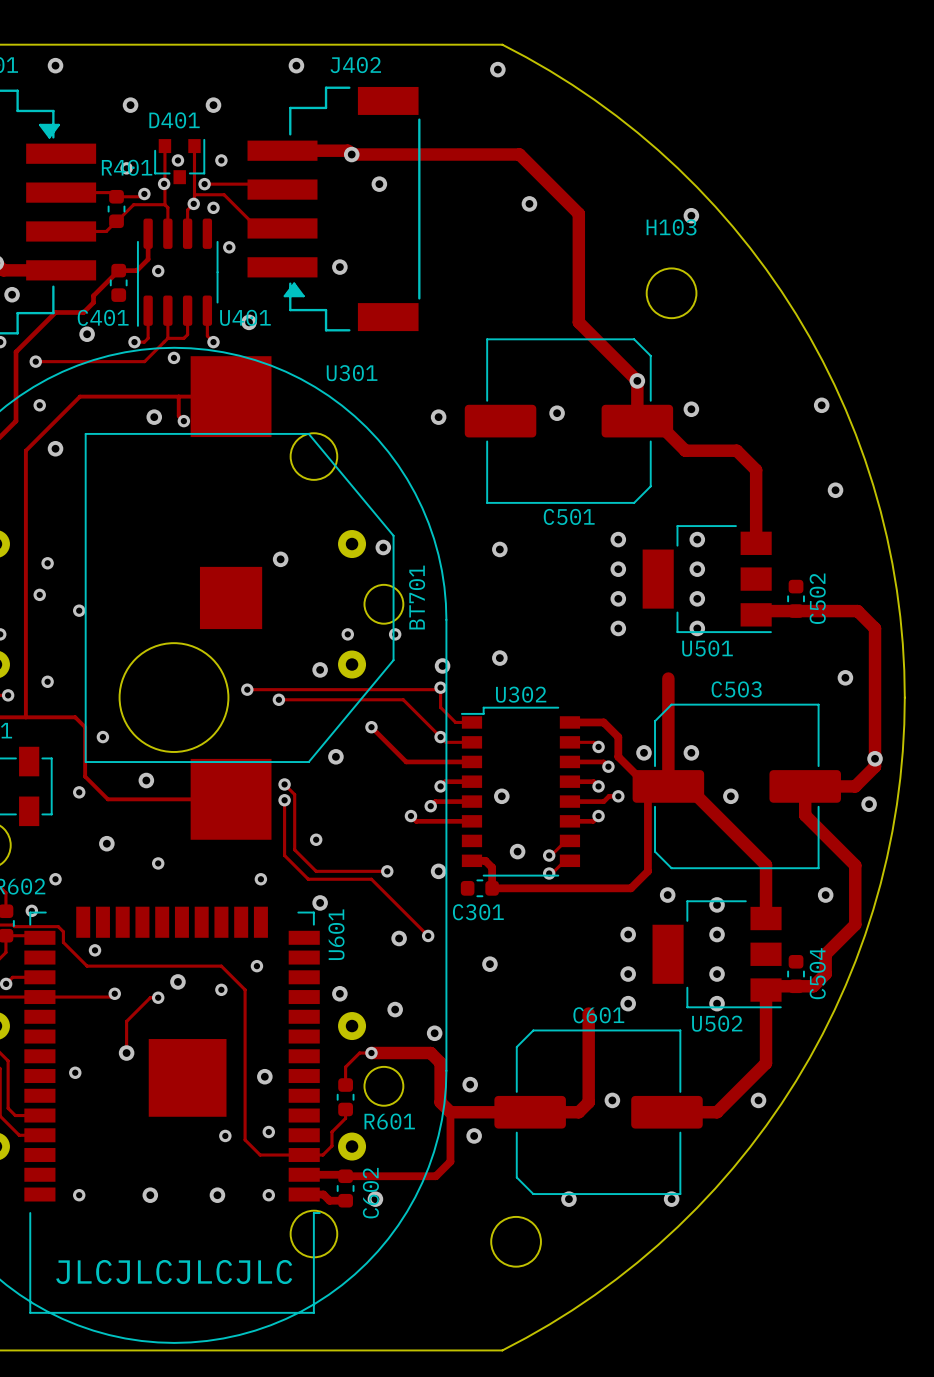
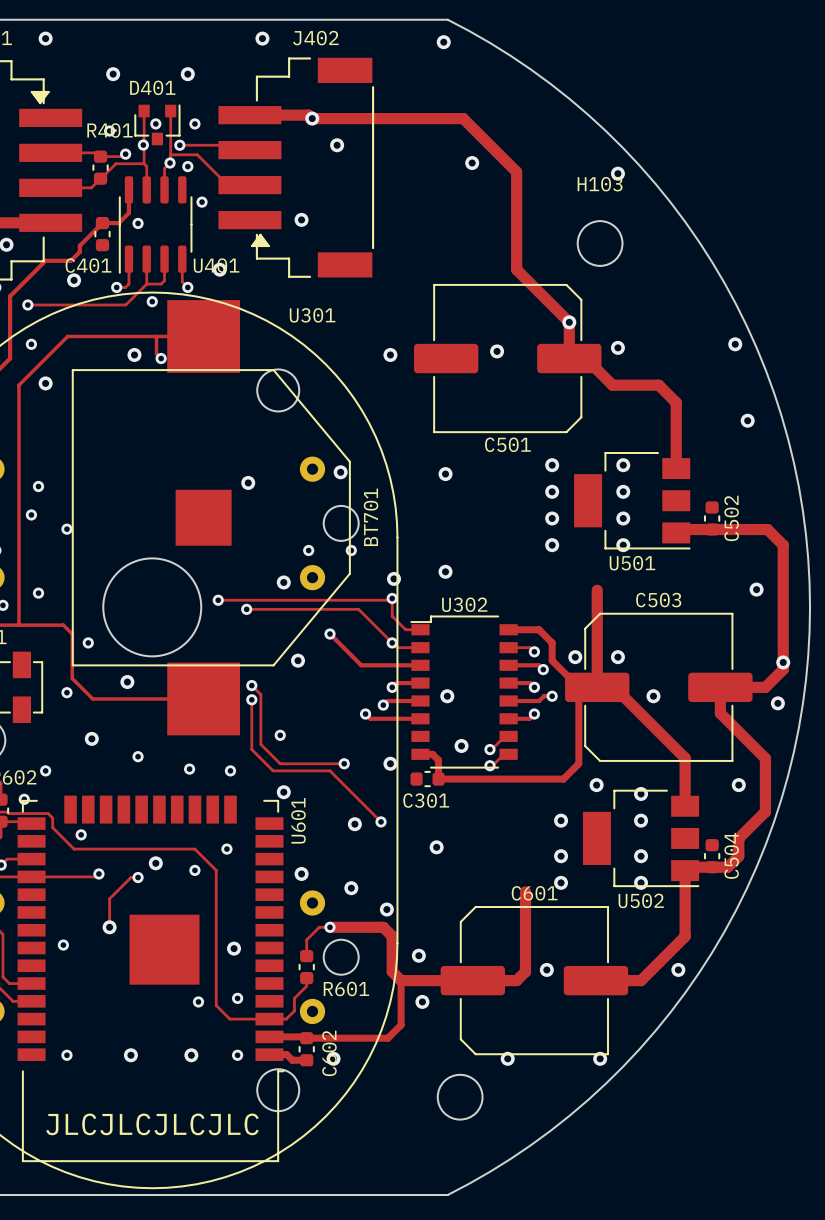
via: none -> (189, 769)

